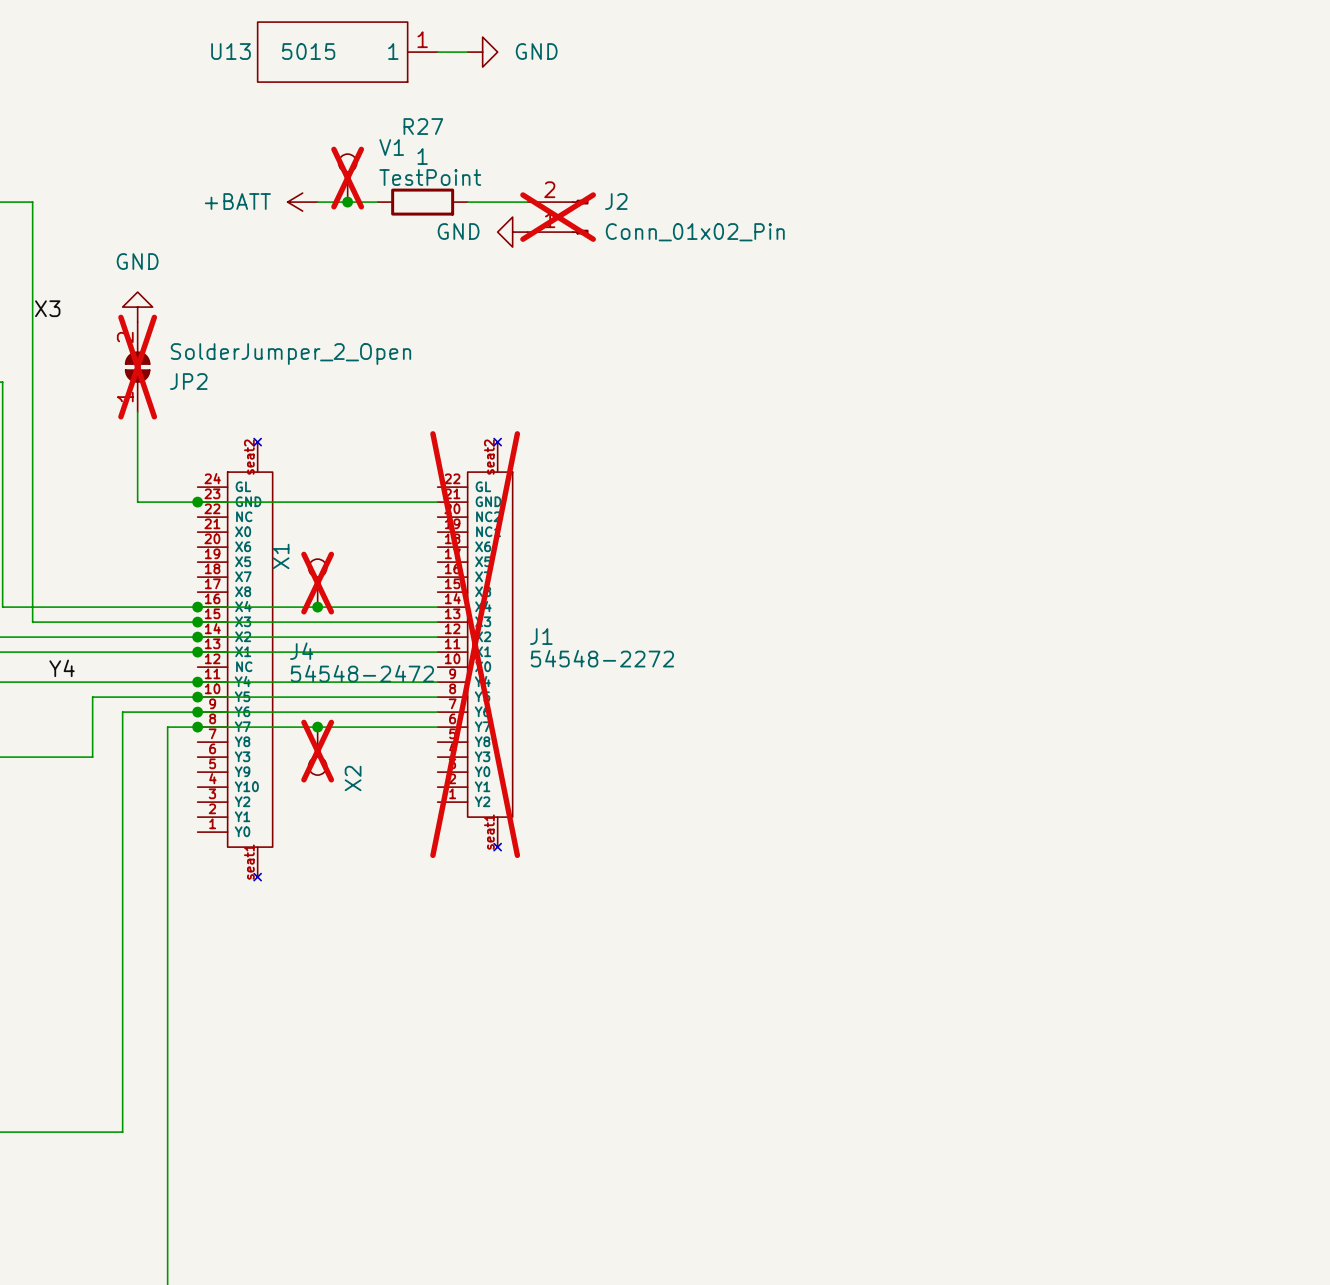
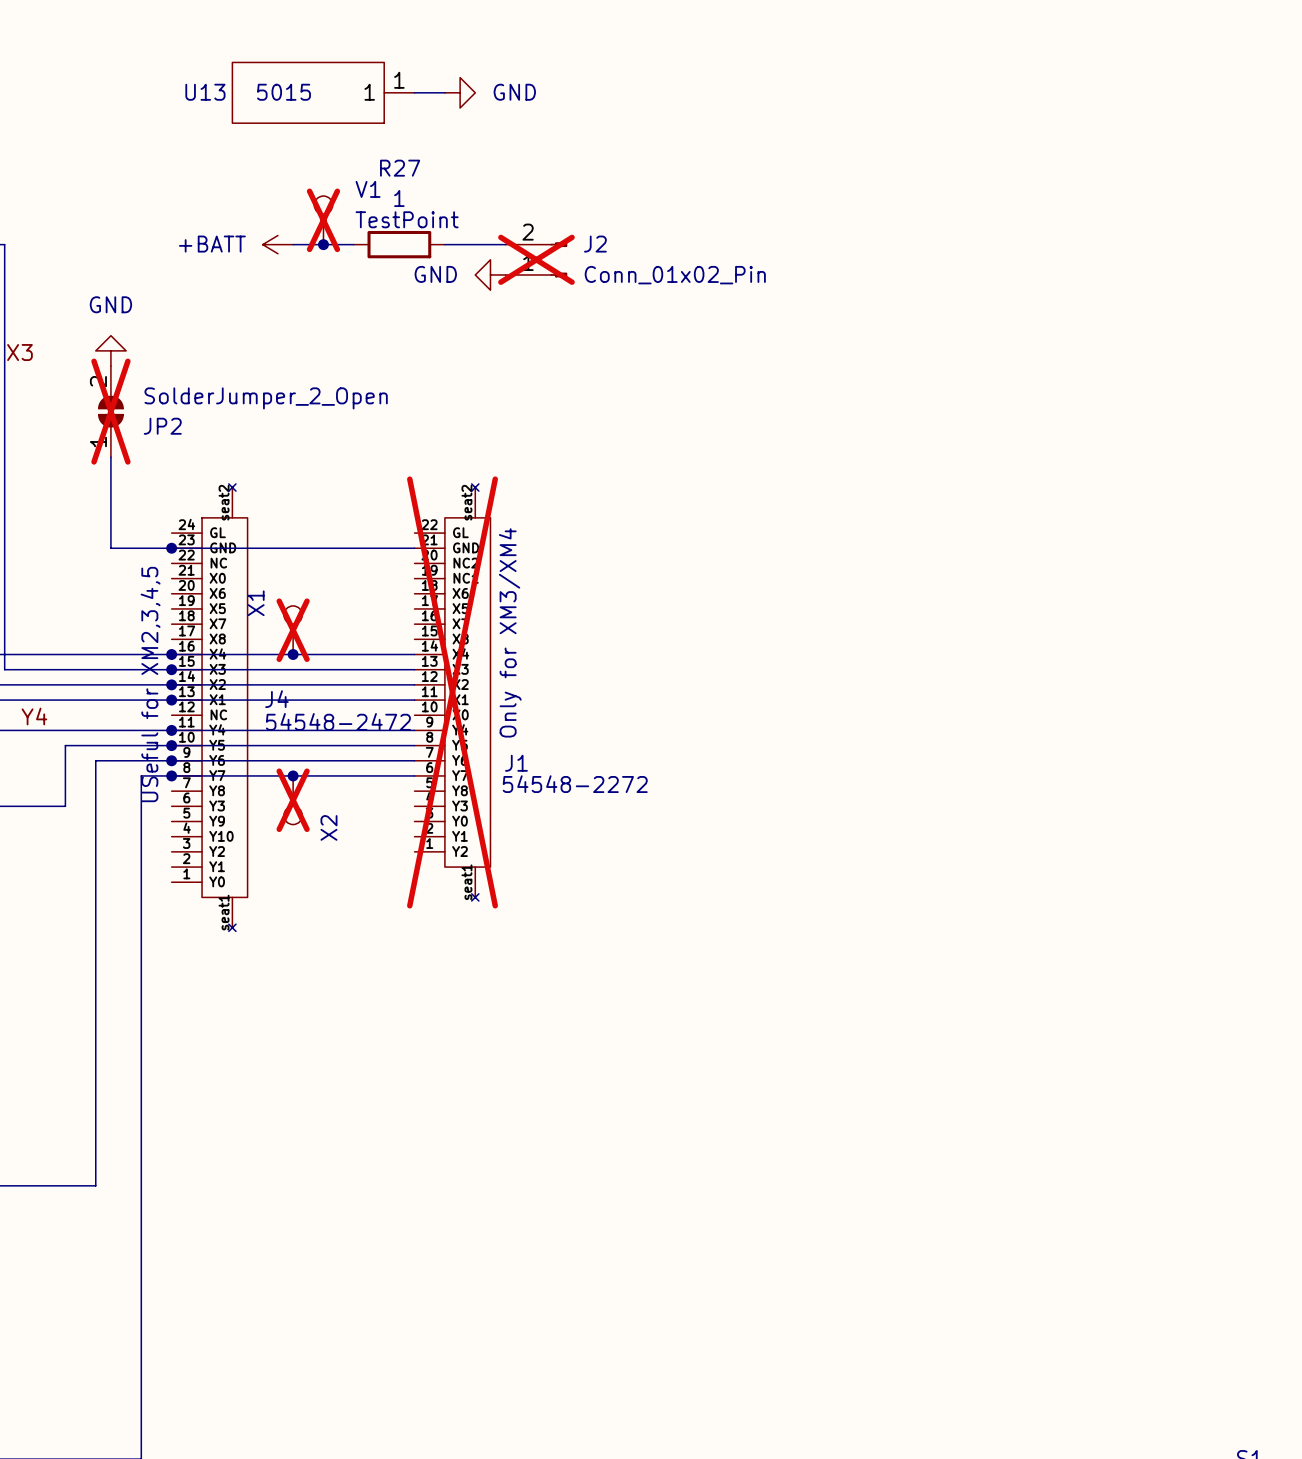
J1 text: none -> Only for XM3/XM4 (510, 632)
J4 text: none -> USeful for XM2,3,4,5 (150, 684)
J1 name position: J1 (541, 636) -> J1 (516, 763)
J1 value position: 54548-2272 (602, 658) -> 54548-2272 (575, 784)

